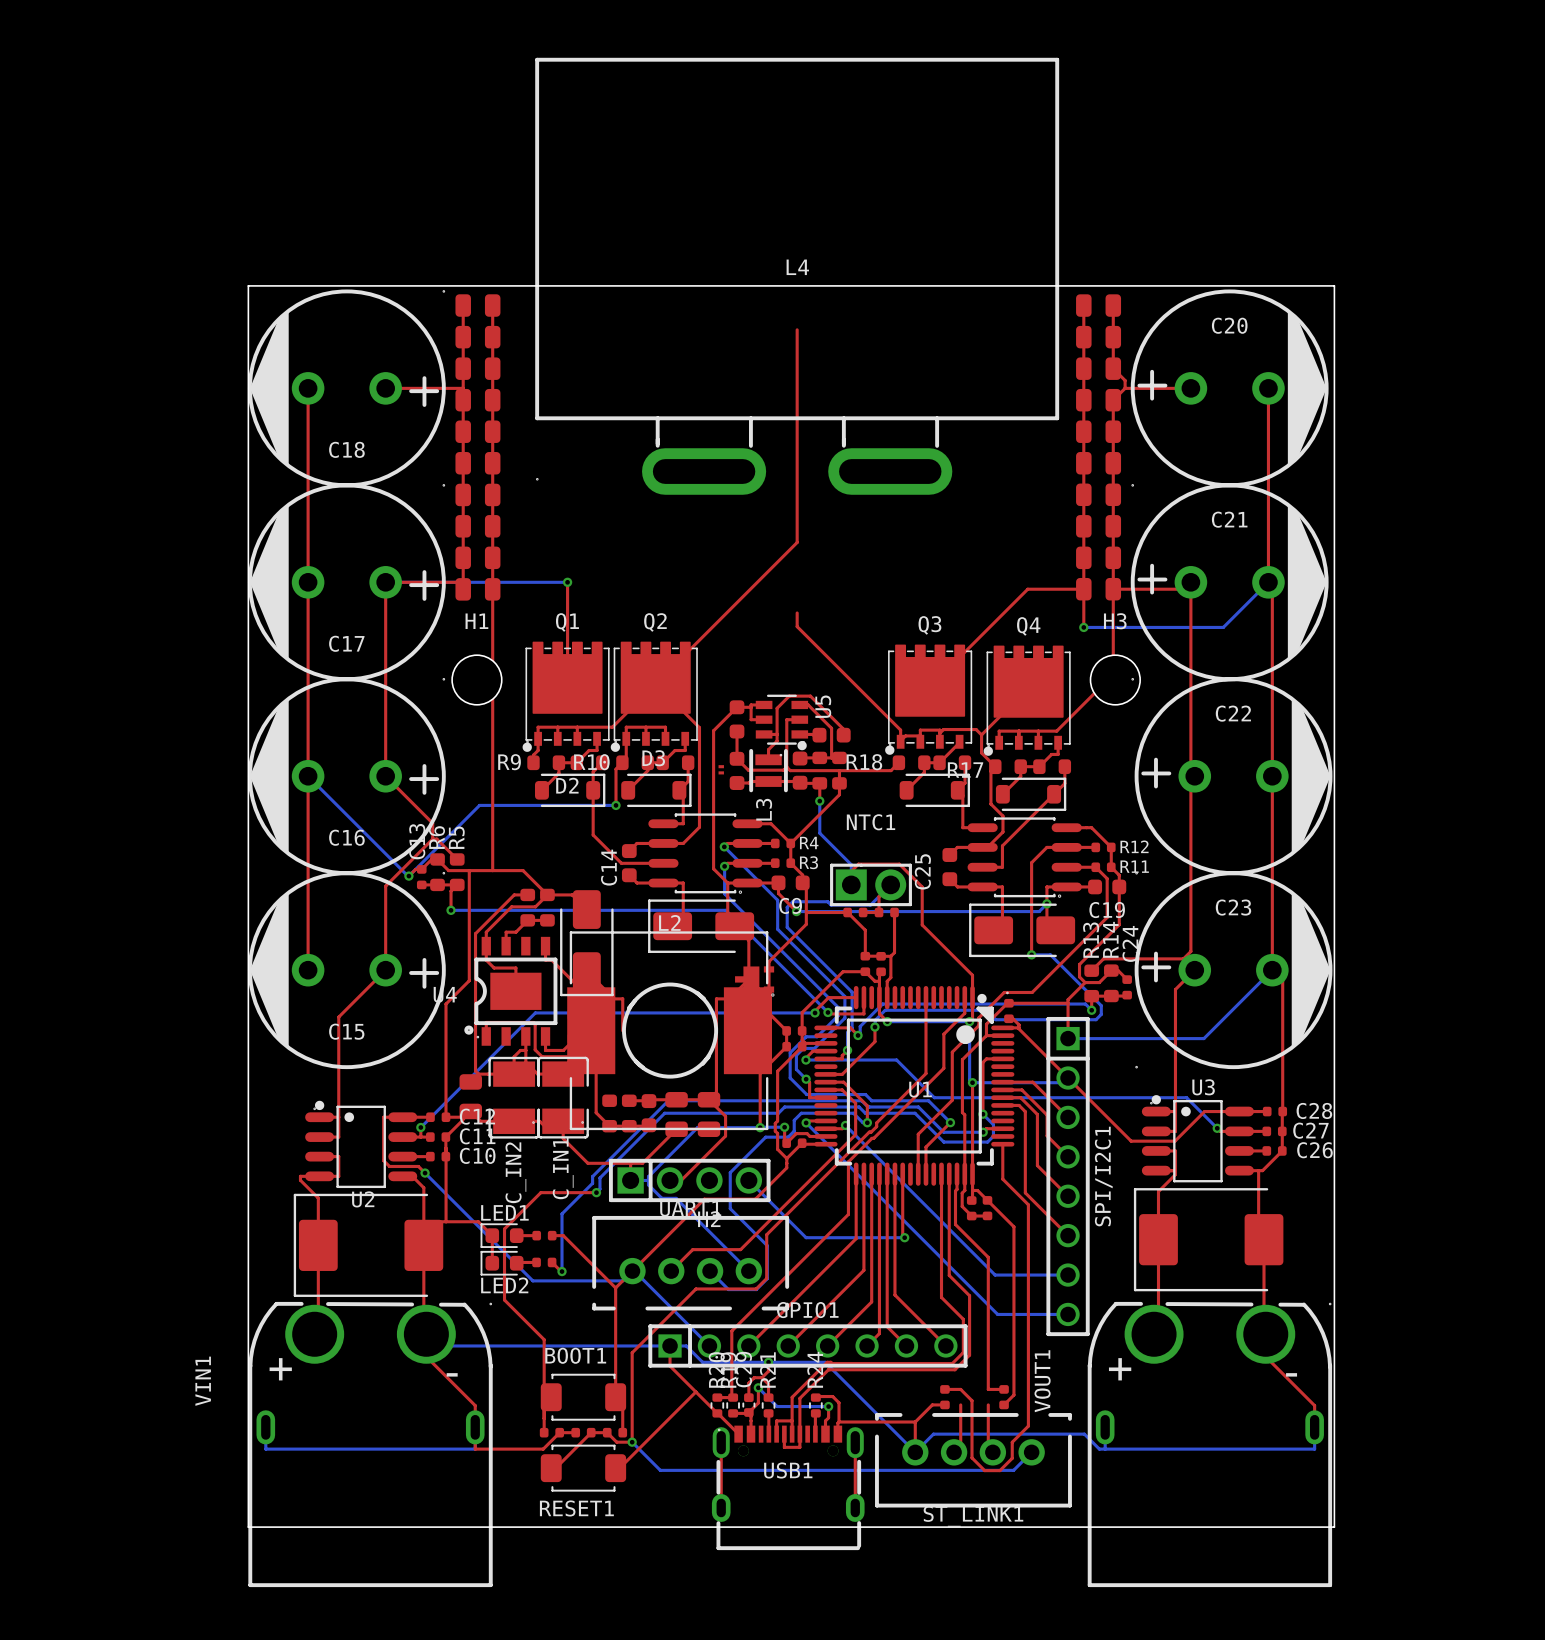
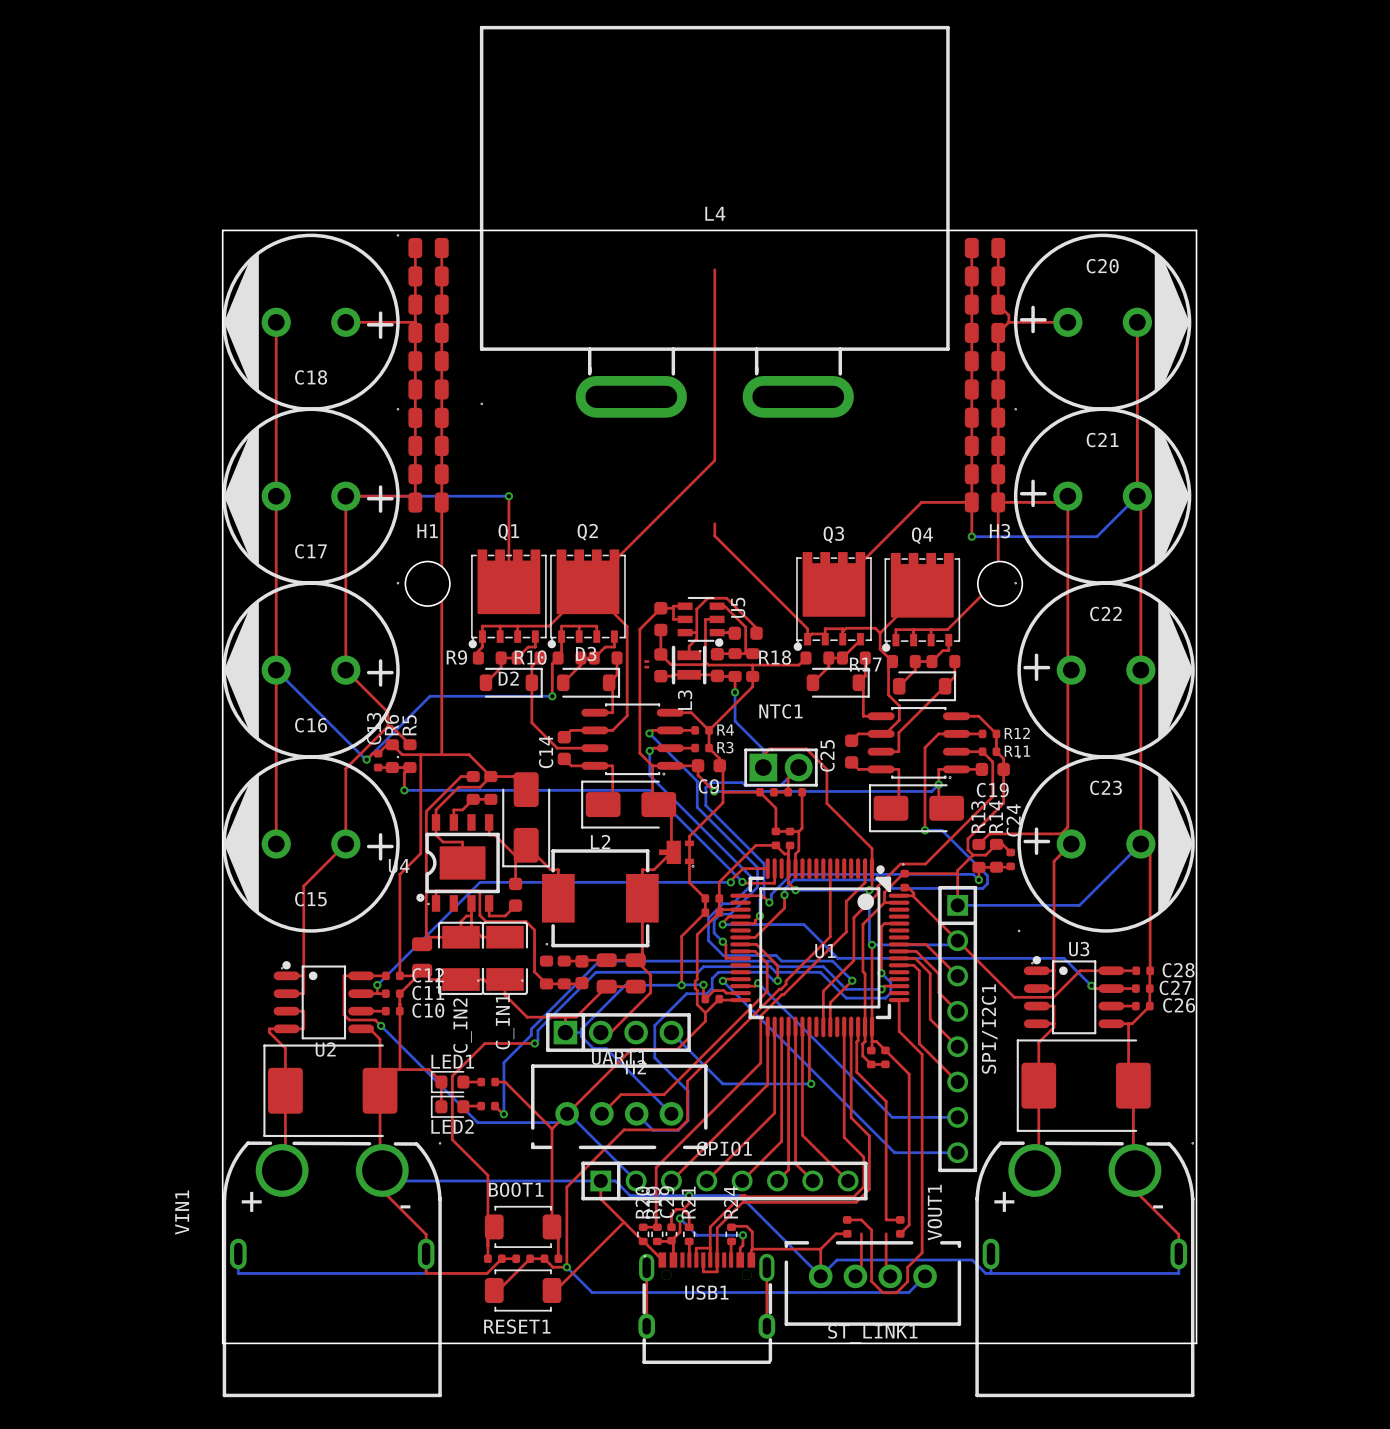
L2 name position: L2 (669, 922) -> L2 (600, 842)
L2 footprint: [567, 931, 772, 1131] -> [542, 849, 659, 948]

